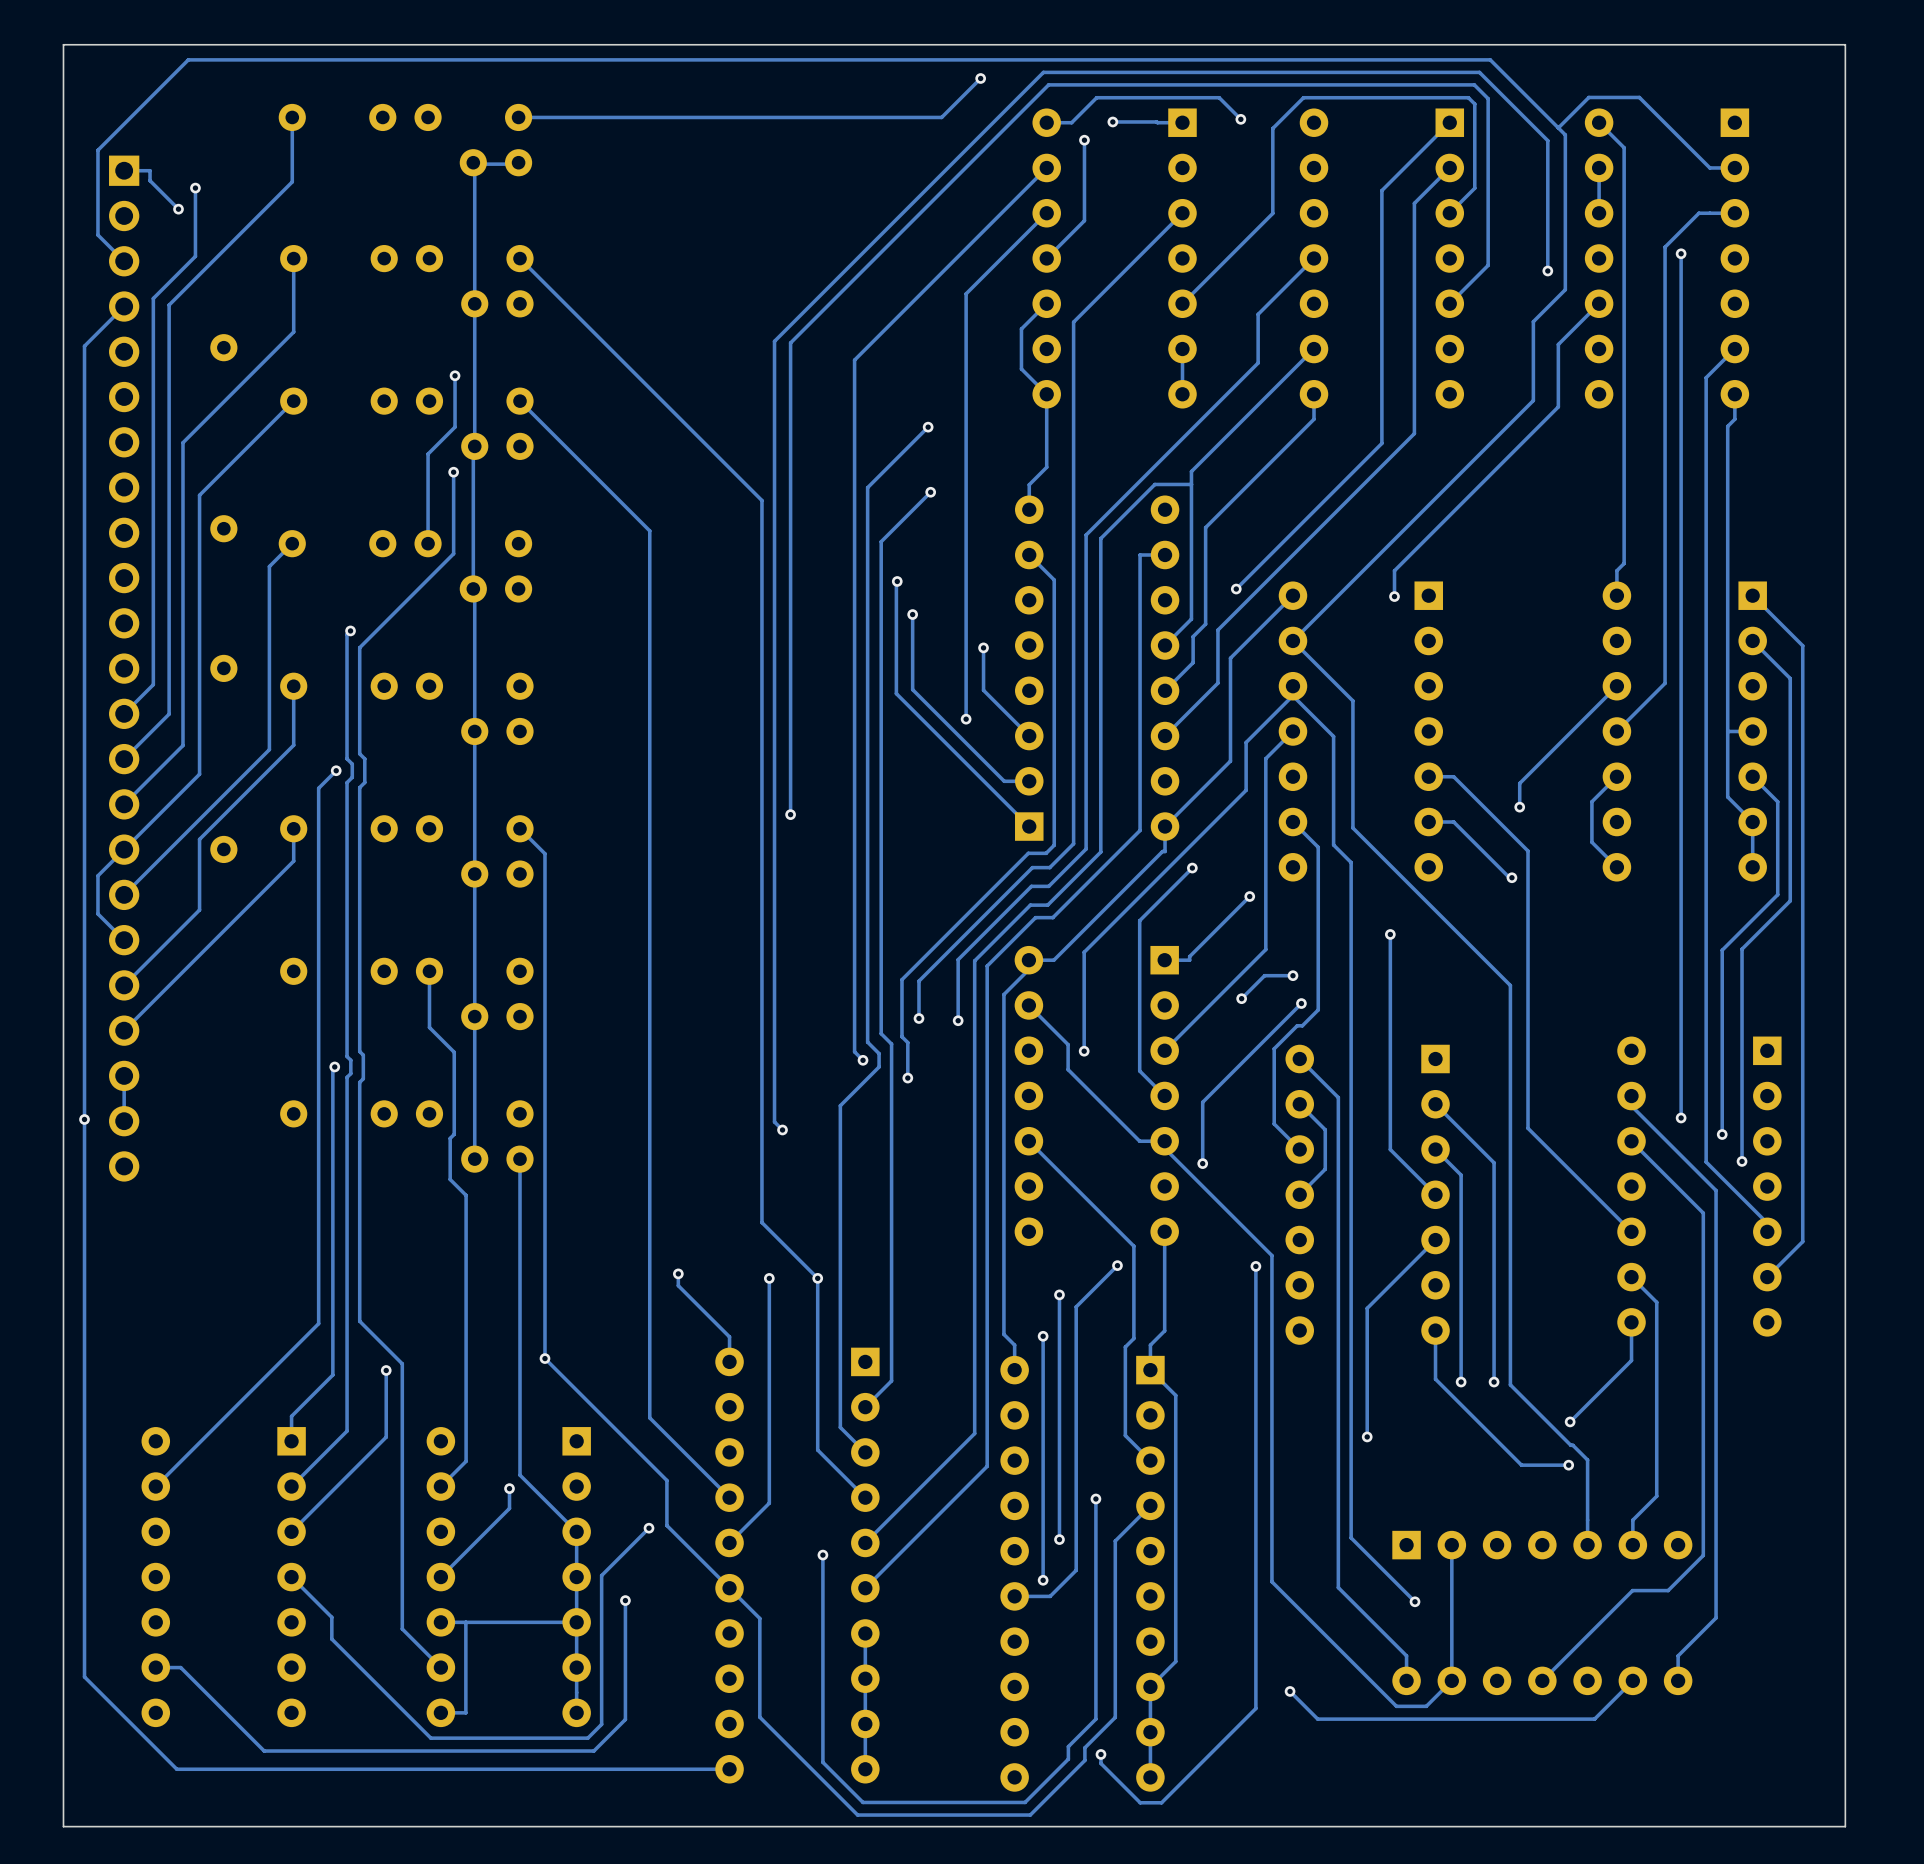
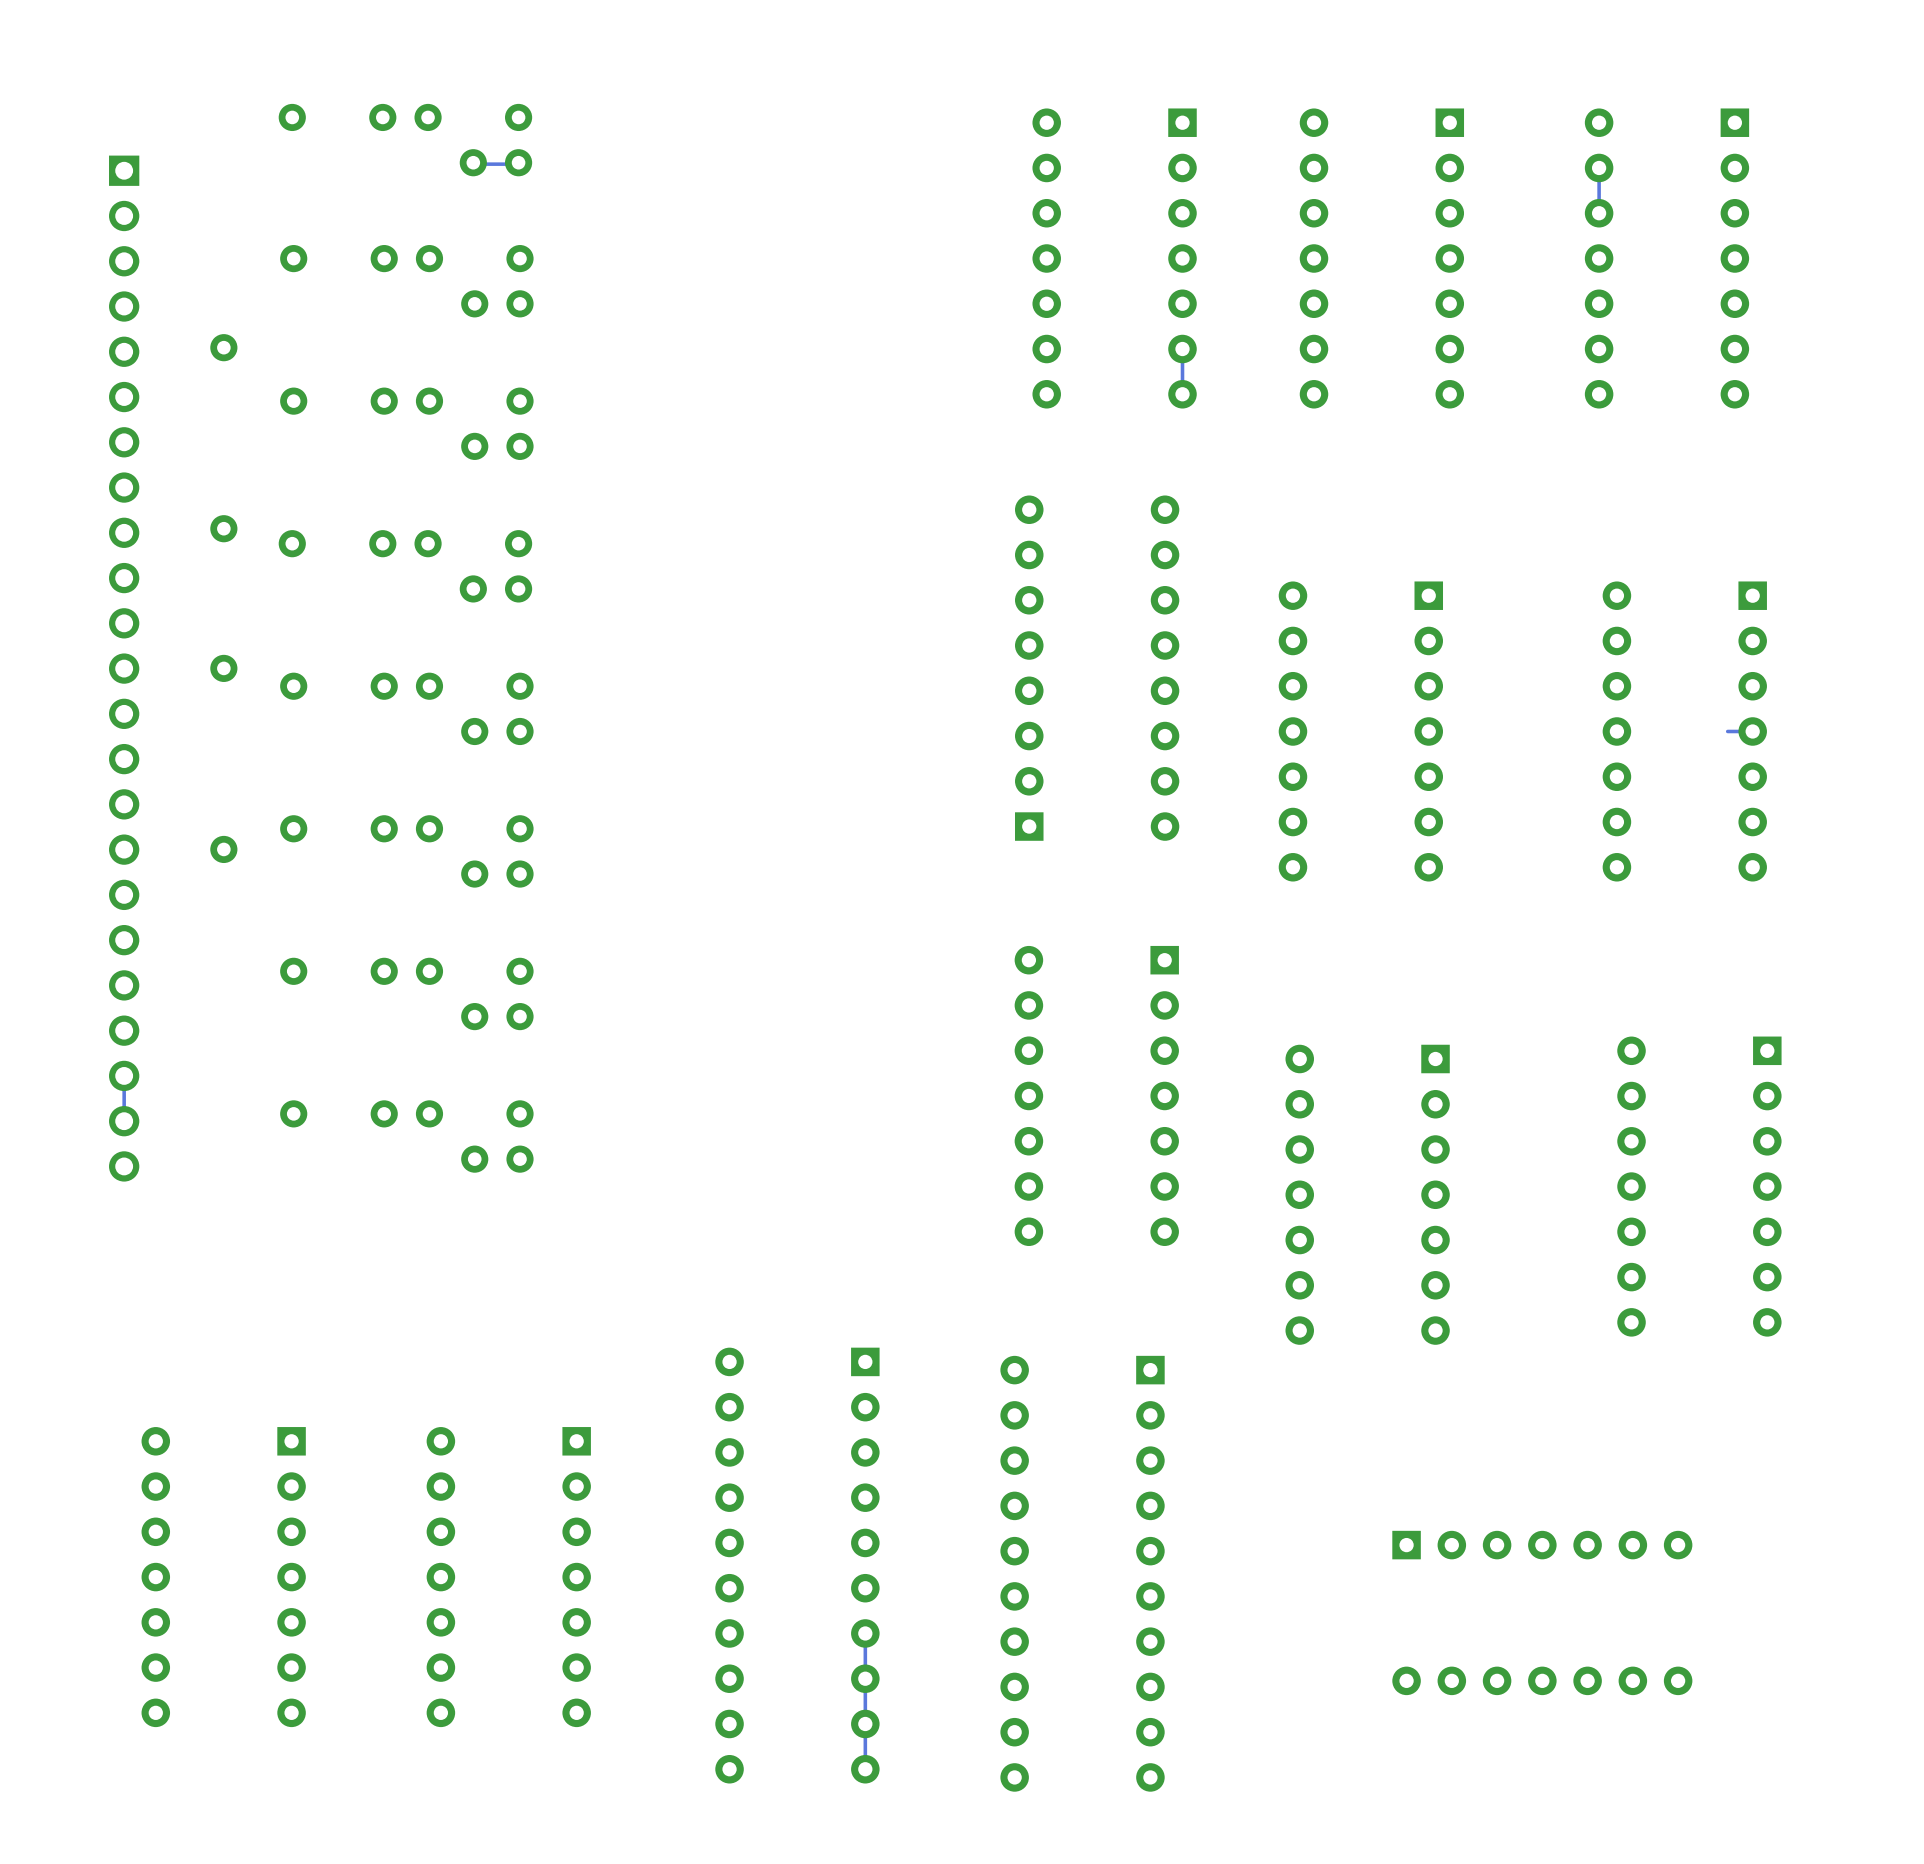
board edge: (1845, 44) (63, 44) (63, 1826) (1845, 1826) (1845, 44) -> none
track: (980, 78) (941, 117) (518, 117) -> none
via: (980, 78) -> none
track: (292, 117) (292, 181) (169, 305) (169, 714) (124, 759) -> none
track: (1240, 119) (1219, 97) (1096, 97) (1071, 122) (1046, 122) -> none
via: (1240, 119) -> none
track: (1112, 121) (1182, 122) -> none
via: (1112, 121) -> none
track: (1449, 122) (1381, 190) (1381, 443) (1236, 589) -> none
track: (1599, 122) (1624, 147) (1624, 563) (1616, 570) (1616, 595) -> none
track: (1558, 127) (1588, 97) (1639, 97) (1709, 167) (1734, 167) -> none
track: (1084, 140) (1084, 220) (1046, 258) -> none
via: (1084, 140) -> none
track: (473, 162) (474, 1159) -> none
track: (1046, 167) (854, 360) (854, 1051) (863, 1060) -> none
track: (1449, 167) (1414, 203) (1414, 433) (1217, 630) (1217, 683) (1165, 736) -> none
track: (124, 170) (150, 170) (150, 180) (178, 209) -> none
track: (195, 188) (195, 256) (153, 298) (153, 684) (124, 713) -> none
via: (195, 188) -> none
via: (178, 209) -> none
track: (1046, 213) (966, 293) (966, 719) -> none
track: (1182, 213) (1073, 322) (1073, 843) (1049, 867) (1032, 867) (918, 981) (918, 1018) -> none
track: (1449, 213) (1474, 188) (1474, 104) (1468, 97) (1303, 97) (1272, 128) (1272, 213) (1182, 303) -> none
track: (1734, 213) (1698, 213) (1665, 247) (1665, 683) (1616, 731) -> none
track: (1681, 253) (1681, 1117) -> none
via: (1681, 253) -> none
track: (293, 258) (293, 332) (182, 442) (182, 745) (124, 804) -> none
track: (520, 258) (761, 500) (761, 1222) (817, 1278) (817, 1450) (865, 1497) -> none
track: (1314, 258) (1258, 314) (1258, 363) (1086, 535) (1086, 849) (1048, 886) (1031, 886) (958, 959) (958, 1020) -> none
track: (124, 261) (97, 235) (97, 150) (188, 59) (1490, 59) (1565, 134) (1565, 289) (1533, 321) (1533, 400) (1292, 640) (1352, 700) (1352, 828) (1510, 985) (1510, 1384) (1587, 1460) (1587, 1545) -> none
track: (1547, 271) (1547, 140) (1479, 72) (1043, 72) (774, 341) (774, 1121) (782, 1129) -> none
via: (1547, 271) -> none
track: (1046, 303) (1021, 329) (1021, 369) (1046, 394) (1046, 467) (1029, 484) (1029, 509) -> none
track: (1449, 303) (1488, 265) (1488, 98) (1474, 84) (1048, 84) (790, 342) (790, 814) -> none
track: (1599, 303) (1558, 344) (1558, 406) (1394, 570) (1394, 596) -> none
track: (124, 306) (84, 346) (84, 1676) (176, 1769) (729, 1769) -> none
track: (1314, 349) (1191, 471) (1191, 619) (1165, 645) -> none
track: (1734, 349) (1706, 377) (1706, 1162) (1767, 1223) (1767, 1231) -> none
track: (455, 375) (455, 427) (428, 454) (428, 543) -> none
via: (455, 375) -> none
track: (1314, 394) (1314, 419) (1205, 527) (1205, 624) (1193, 636) (1193, 662) (1165, 690) -> none
track: (1734, 394) (1734, 419) (1727, 426) (1727, 797) (1752, 822) (1752, 867) -> none
track: (293, 401) (199, 495) (199, 774) (97, 875) (97, 913) (124, 940) -> none
track: (520, 401) (649, 530) (649, 1417) (729, 1497) -> none
track: (928, 427) (867, 487) (867, 1042) (879, 1053) (879, 1066) (840, 1105) (840, 1427) (865, 1452) -> none
via: (928, 427) -> none
track: (453, 472) (453, 553) (359, 647) (359, 753) (364, 758) (364, 782) (359, 787) (359, 1051) (363, 1055) (363, 1078) (359, 1082) (359, 1321) (402, 1363) (402, 1629) (440, 1667) -> none
via: (453, 472) -> none
track: (1191, 484) (1154, 484) (1100, 538) (1100, 852) (1047, 905) (1030, 905) (974, 960) (974, 1433) (865, 1542) -> none
track: (930, 492) (881, 541) (881, 1033) (891, 1044) (891, 1380) (865, 1407) -> none
via: (930, 492) -> none
track: (292, 543) (269, 566) (269, 749) (124, 894) -> none
track: (1029, 554) (1054, 579) (1054, 845) (1046, 853) (1028, 853) (901, 979) (901, 1036) (907, 1042) (907, 1078) -> none
track: (1165, 554) (1140, 554) (1140, 830) (1052, 917) (1035, 917) (987, 966) (987, 1466) (865, 1588) -> none
track: (897, 581) (896, 693) (1029, 826) -> none
via: (897, 581) -> none
via: (1236, 589) -> none
track: (1292, 595) (1230, 658) (1230, 761) (1165, 826) (1165, 851) (1162, 851) (1053, 960) (1028, 960) -> none
track: (1752, 595) (1802, 645) (1802, 1241) (1767, 1277) -> none
via: (1394, 596) -> none
track: (912, 614) (912, 689) (1004, 781) (1029, 781) -> none
via: (912, 614) -> none
track: (350, 630) (347, 634) (347, 758) (352, 764) (352, 777) (347, 782) (347, 1056) (350, 1060) (350, 1073) (347, 1077) (347, 1431) (291, 1486) -> none
via: (350, 630) -> none
track: (1752, 640) (1790, 678) (1790, 900) (1742, 949) (1742, 1161) -> none
track: (983, 647) (983, 690) (1029, 736) -> none
via: (983, 647) -> none
track: (293, 686) (293, 745) (199, 839) (199, 910) (124, 985) -> none
track: (1292, 686) (1292, 695) (1246, 742) (1246, 790) (1084, 952) (1084, 1051) -> none
track: (1616, 686) (1519, 783) (1519, 807) -> none
track: (1292, 695) (1333, 736) (1333, 844) (1351, 862) (1351, 1537) (1415, 1601) -> none
via: (966, 719) -> none
track: (1292, 731) (1265, 758) (1265, 949) (1164, 1050) -> none
track: (336, 770) (318, 788) (318, 1323) (155, 1486) -> none
via: (336, 770) -> none
track: (1428, 776) (1453, 776) (1528, 851) (1528, 1128) (1631, 1231) -> none
track: (1616, 776) (1591, 801) (1591, 842) (1616, 867) -> none
track: (1752, 776) (1777, 801) (1777, 894) (1722, 950) (1722, 1134) -> none
via: (1519, 807) -> none
via: (790, 814) -> none
track: (1292, 822) (1318, 847) (1318, 1009) (1302, 1025) (1297, 1025) (1274, 1048) (1274, 1123) (1299, 1149) -> none
track: (1428, 822) (1453, 822) (1509, 877) (1511, 877) -> none
track: (293, 828) (293, 861) (124, 1030) -> none
track: (520, 828) (544, 853) (544, 1358) (666, 1480) (666, 1525) (759, 1618) (759, 1717) (857, 1815) (1030, 1815) (1084, 1760) (1084, 1747) (1115, 1717) (1115, 1541) (1150, 1505) -> none
track: (1192, 868) (1139, 920) (1139, 1070) (1164, 1095) -> none
via: (1192, 868) -> none
via: (1511, 877) -> none
track: (1249, 896) (1189, 956) (1189, 960) (1164, 960) -> none
via: (1249, 896) -> none
track: (1390, 934) (1390, 1149) (1435, 1194) -> none
via: (1390, 934) -> none
track: (1038, 960) (1003, 994) (1003, 1334) (1014, 1345) (1014, 1370) -> none
track: (429, 971) (429, 1027) (454, 1052) (454, 1134) (450, 1138) (450, 1179) (466, 1195) (466, 1461) (440, 1486) -> none
track: (1292, 975) (1264, 975) (1241, 998) -> none
via: (1292, 975) -> none
via: (1241, 998) -> none
track: (1301, 1003) (1202, 1102) (1202, 1163) -> none
via: (1301, 1003) -> none
track: (1028, 1005) (1068, 1044) (1068, 1069) (1139, 1141) (1164, 1141) (1164, 1148) (1271, 1255) (1271, 1581) (1396, 1706) (1426, 1706) (1451, 1680) (1451, 1545) -> none
via: (918, 1018) -> none
via: (958, 1020) -> none
via: (1084, 1051) -> none
track: (1299, 1058) (1338, 1097) (1338, 1587) (1406, 1655) (1406, 1680) -> none
via: (863, 1060) -> none
track: (334, 1066) (332, 1068) (332, 1375) (291, 1416) (291, 1441) -> none
via: (334, 1066) -> none
via: (907, 1078) -> none
track: (1631, 1096) (1631, 1105) (1716, 1190) (1716, 1617) (1678, 1655) (1678, 1680) -> none
track: (1299, 1104) (1325, 1129) (1325, 1169) (1299, 1194) -> none
track: (1435, 1104) (1494, 1162) (1494, 1382) -> none
via: (1681, 1117) -> none
via: (84, 1119) -> none
via: (782, 1129) -> none
via: (1722, 1134) -> none
track: (1028, 1141) (1133, 1246) (1133, 1338) (1125, 1347) (1125, 1435) (1150, 1460) -> none
track: (1631, 1141) (1703, 1213) (1703, 1555) (1668, 1590) (1632, 1590) (1542, 1680) -> none
track: (1435, 1149) (1461, 1175) (1461, 1382) -> none
track: (520, 1159) (520, 1475) (576, 1531) (576, 1712) -> none
via: (1742, 1161) -> none
via: (1202, 1163) -> none
track: (1164, 1231) (1164, 1330) (1150, 1345) (1150, 1370) (1175, 1395) (1175, 1661) (1150, 1686) (1150, 1777) -> none
track: (1435, 1240) (1367, 1308) (1367, 1436) -> none
track: (1117, 1265) (1076, 1306) (1076, 1570) (1050, 1596) (1014, 1596) -> none
via: (1117, 1265) -> none
track: (1255, 1266) (1255, 1708) (1161, 1802) (1140, 1802) (1100, 1763) (1100, 1754) -> none
via: (1255, 1266) -> none
track: (678, 1273) (678, 1285) (729, 1336) (729, 1361) -> none
via: (678, 1273) -> none
track: (1631, 1277) (1656, 1302) (1656, 1496) (1632, 1520) (1632, 1545) -> none
track: (769, 1278) (769, 1503) (729, 1542) -> none
via: (769, 1278) -> none
via: (817, 1278) -> none
track: (1059, 1294) (1059, 1539) -> none
via: (1059, 1294) -> none
track: (1631, 1322) (1631, 1360) (1570, 1421) -> none
track: (1435, 1330) (1435, 1379) (1521, 1465) (1568, 1465) -> none
track: (1043, 1336) (1043, 1580) -> none
via: (1043, 1336) -> none
via: (544, 1358) -> none
track: (386, 1370) (386, 1437) (291, 1531) -> none
via: (386, 1370) -> none
via: (1461, 1382) -> none
via: (1494, 1382) -> none
via: (1570, 1421) -> none
via: (1367, 1436) -> none
via: (1568, 1465) -> none
track: (509, 1488) (509, 1508) (440, 1577) -> none
via: (509, 1488) -> none
track: (1095, 1498) (1095, 1719) (1068, 1746) (1068, 1759) (1025, 1802) (863, 1802) (822, 1762) (822, 1555) -> none
via: (1095, 1498) -> none
track: (649, 1528) (601, 1575) (601, 1724) (587, 1738) (430, 1738) (331, 1639) (331, 1617) (291, 1577) -> none
via: (649, 1528) -> none
via: (1059, 1539) -> none
via: (822, 1555) -> none
via: (1043, 1580) -> none
track: (625, 1600) (625, 1719) (593, 1751) (264, 1751) (180, 1667) (155, 1667) -> none
via: (625, 1600) -> none
via: (1415, 1601) -> none
track: (465, 1622) (465, 1712) (440, 1712) -> none
track: (576, 1622) (440, 1622) -> none
track: (1632, 1680) (1594, 1719) (1317, 1719) (1290, 1691) -> none
via: (1290, 1691) -> none
via: (1100, 1754) -> none

